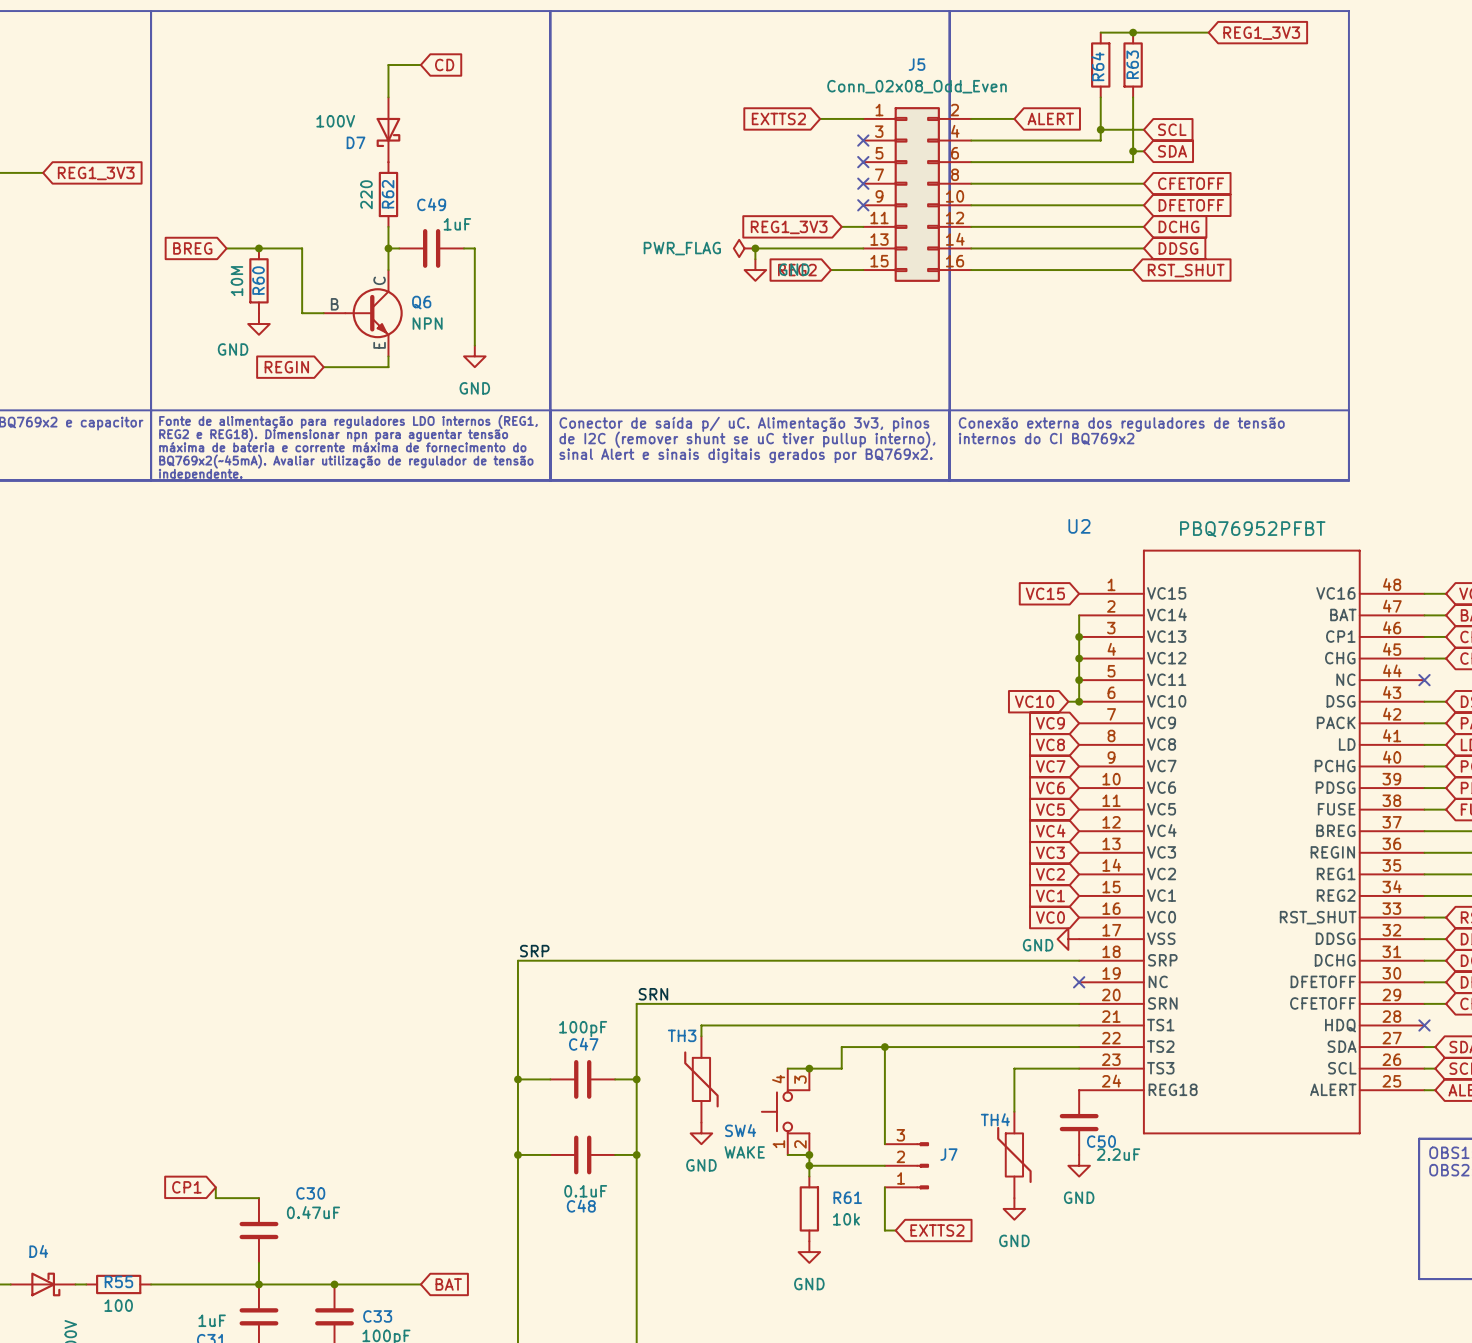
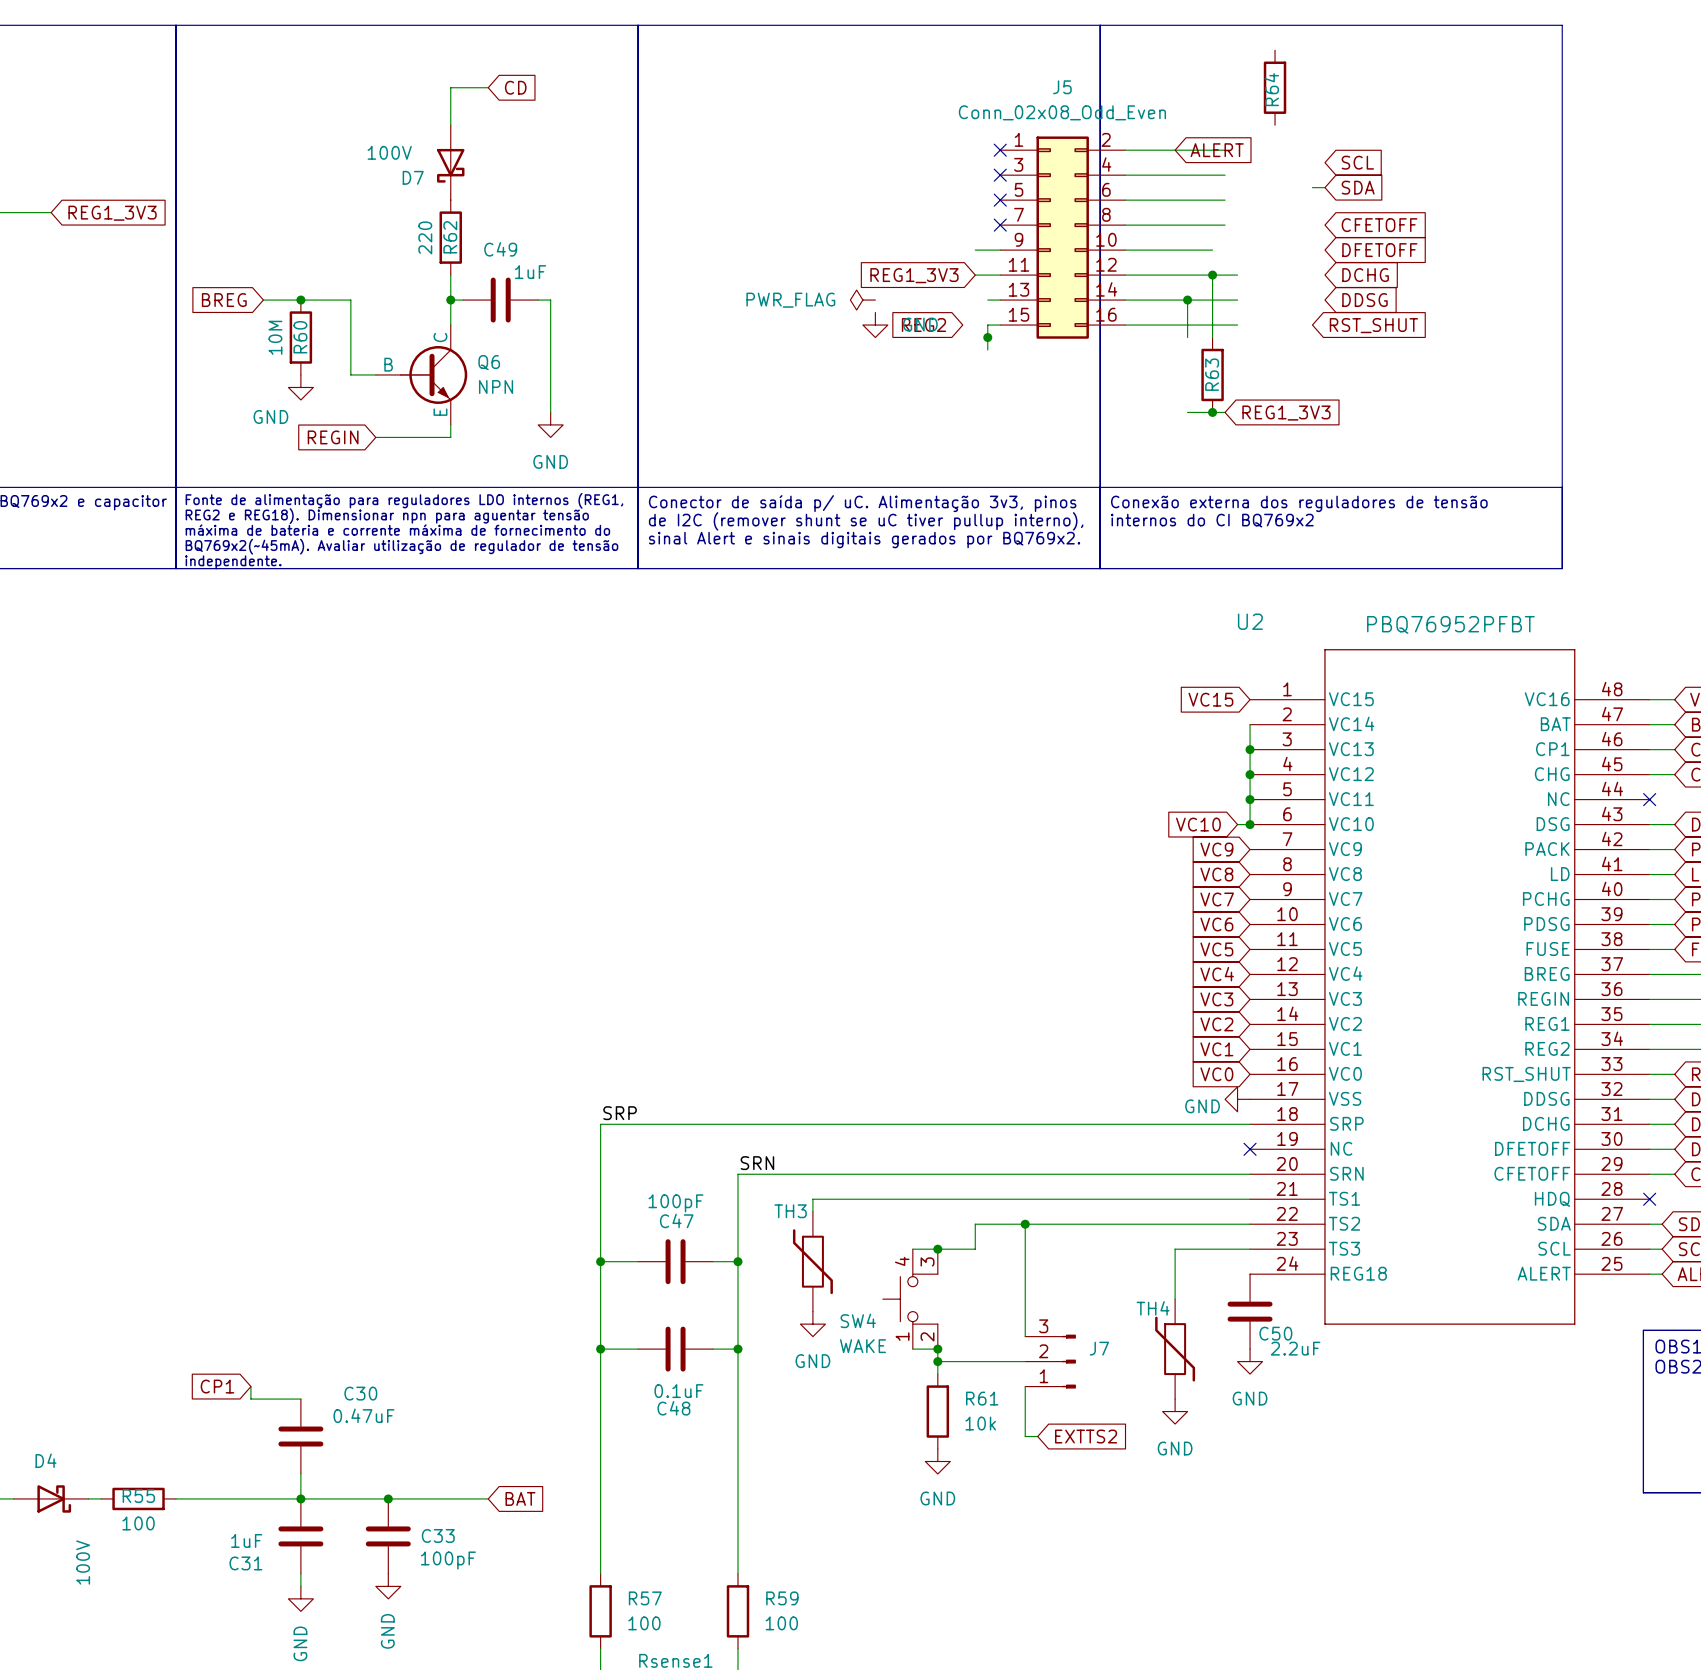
wire: (1100, 32) (1208, 32) -> none
junction: (1133, 32) -> none
global label: REG1_3V3 (1261, 33) -> none
R63 position: (1133, 65) -> (1212, 374)
wire: (1100, 97) (1100, 140) (1057, 140) -> none
wire: (1133, 97) (1133, 162) (1057, 162) -> none
global label: EXTTS2 (778, 118) -> none
wire: (820, 118) (863, 118) -> none
no-connect mark: none -> (1000, 150)
wire: (1100, 129) (1143, 129) -> (1175, 150) (1225, 150)
junction: (1100, 129) -> none
junction: (1133, 151) -> none
wire: (1057, 183) (1143, 183) -> none
wire: none -> (975, 250) (1000, 250)
no-connect mark: (863, 205) -> none
wire: (1046, 205) (1143, 205) -> none
wire: none -> (1212, 275) (1212, 337)
junction: none -> (1212, 275)
wire: (1068, 226) (1143, 226) -> none
junction: (755, 248) -> none
wire: (852, 248) (755, 248) (755, 259) -> none
wire: none -> (1187, 300) (1187, 337)
junction: none -> (1187, 300)
wire: (1068, 248) (1143, 248) -> none
wire: (830, 270) (852, 270) -> (987, 350) (987, 325)
wire: (1068, 270) (1133, 270) -> none
junction: none -> (987, 337)
wire: none -> (1187, 412) (1225, 412)
junction: none -> (1212, 412)
global label: none -> REG1_3V3 (1286, 413)

